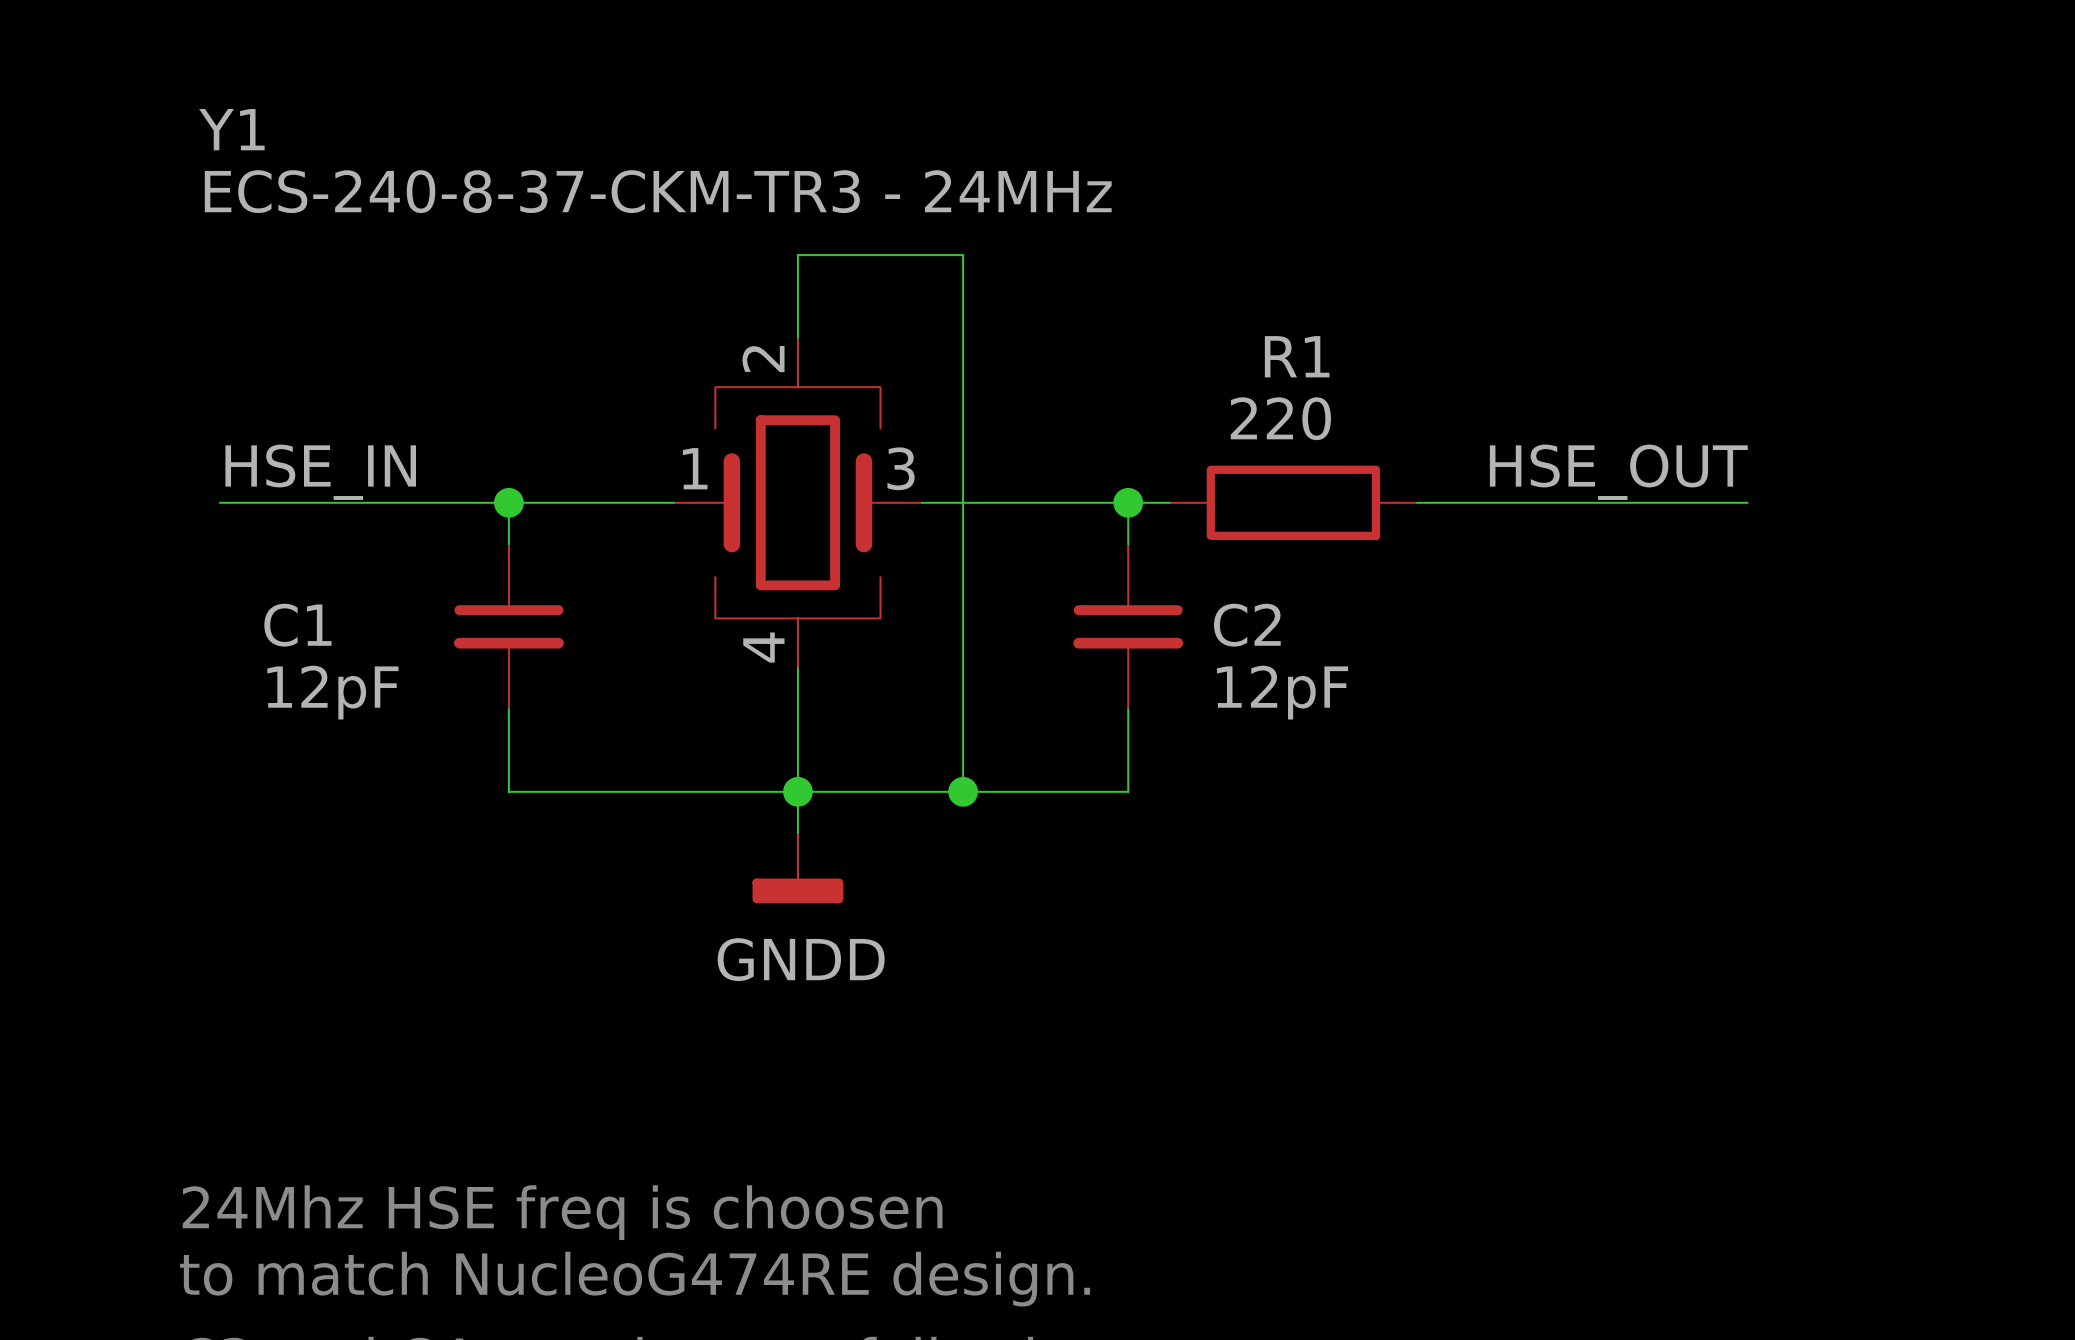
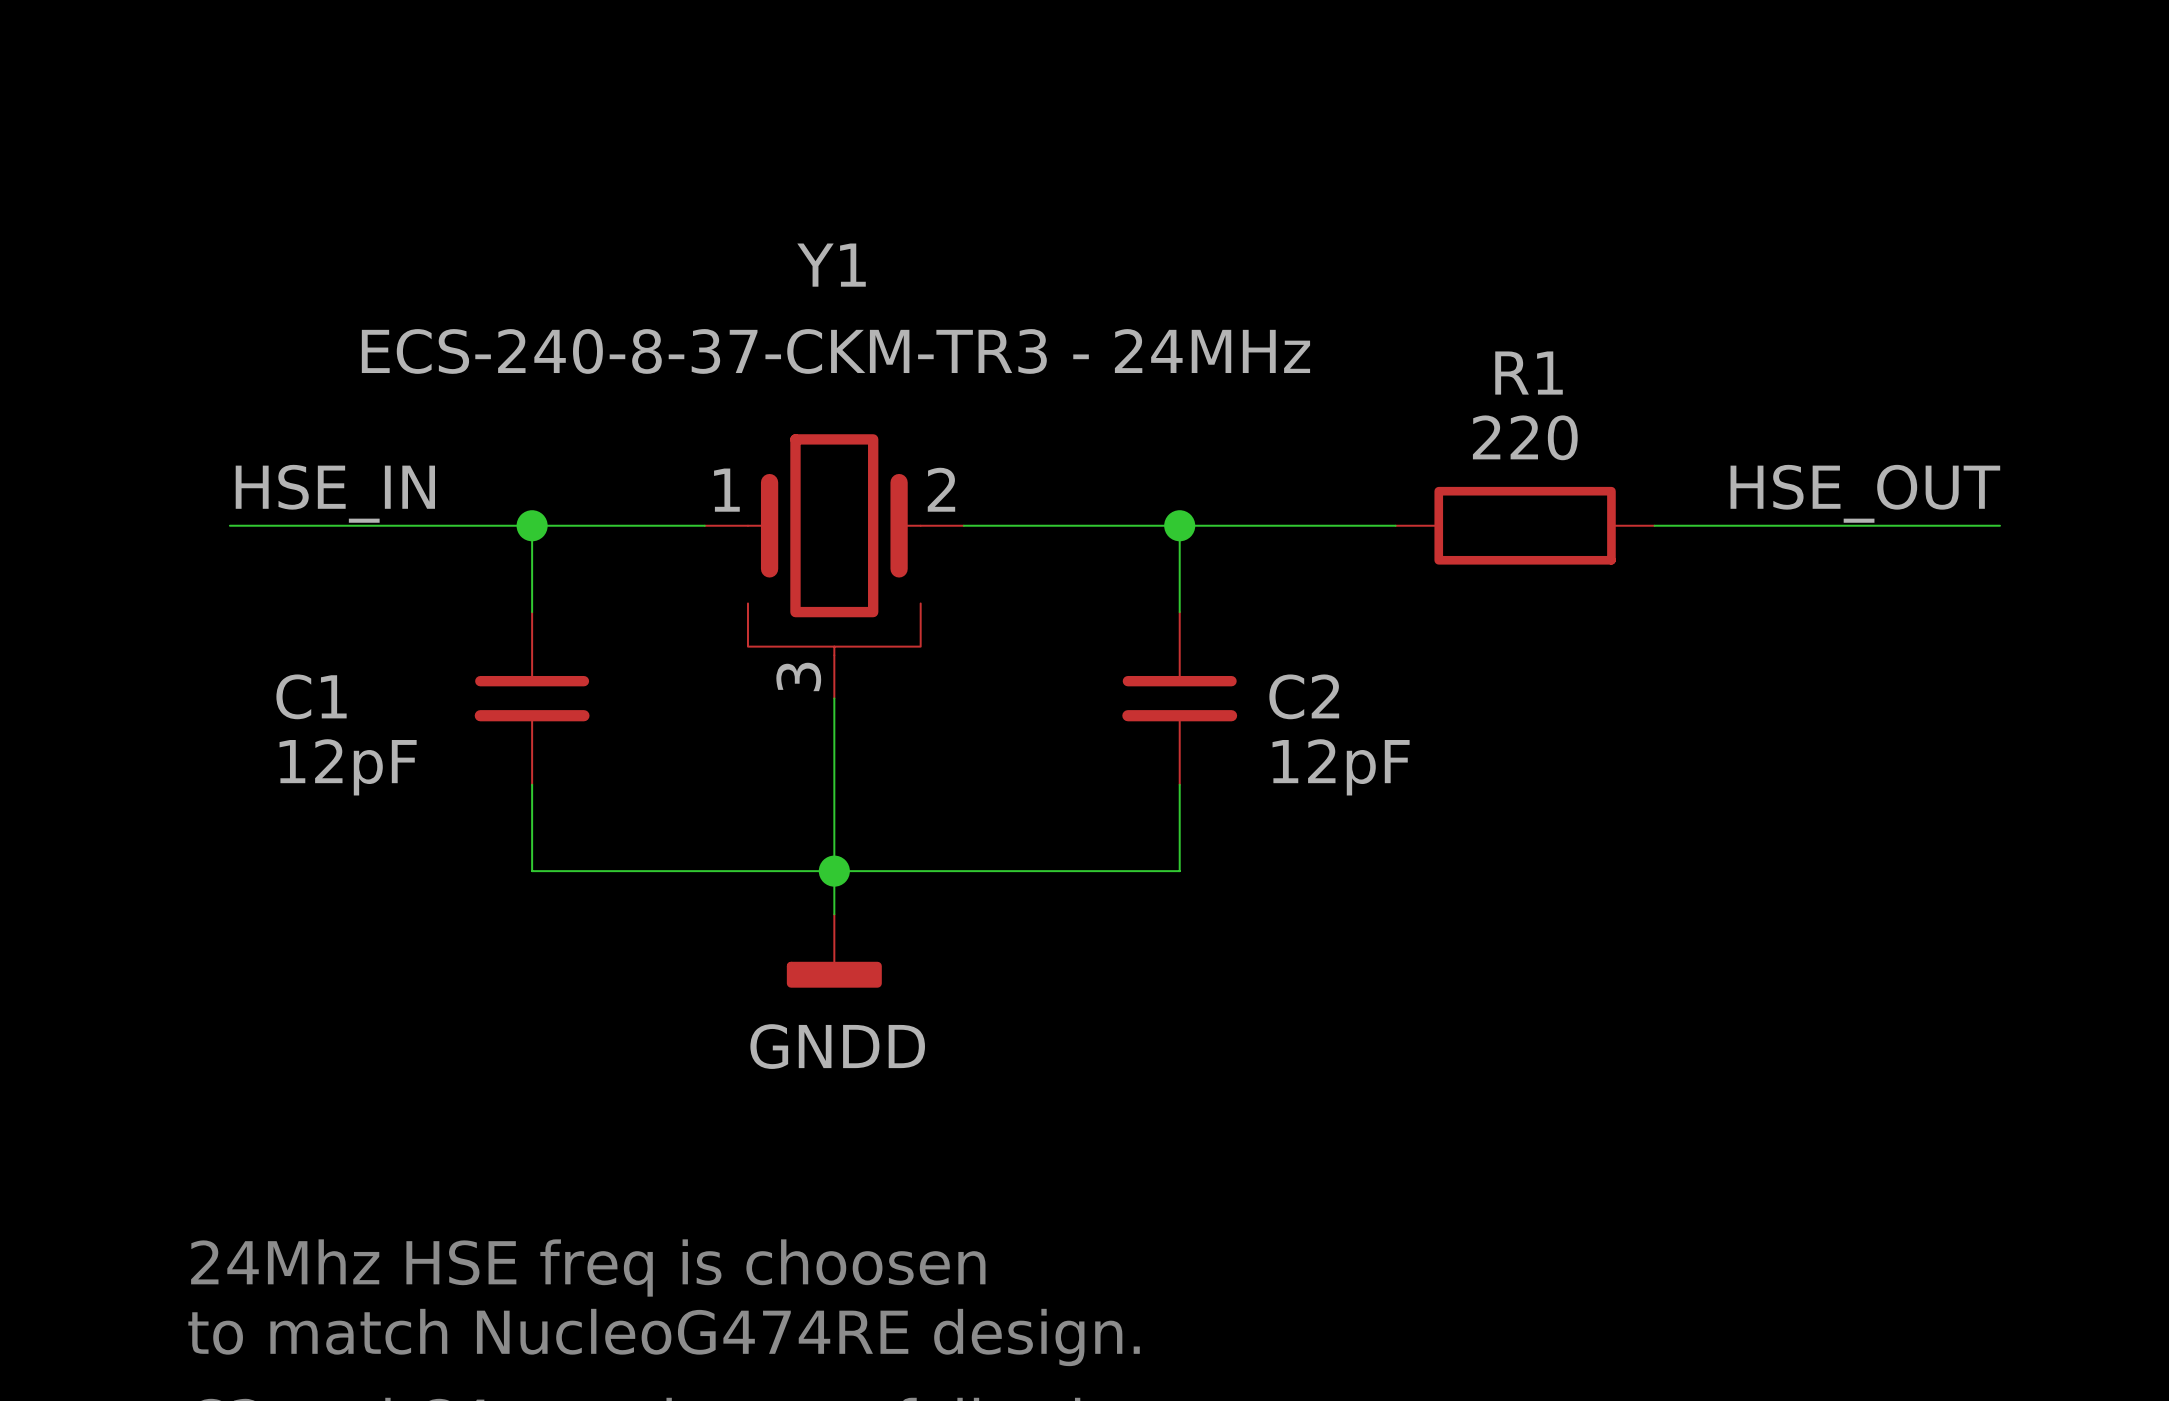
Y1 name position: Y1 (231, 129) -> Y1 (831, 265)
Y1 value position: ECS-240-8-37-CKM-TR3 - 24MHz (658, 191) -> ECS-240-8-37-CKM-TR3 - 24MHz (835, 351)
Y1 symbol: [674, 337, 922, 668] -> [704, 434, 964, 699]
wire: (797, 337) (797, 255) (963, 255) (963, 791) -> none
R1 value position: 220 (1280, 418) -> 220 (1525, 437)
label position: HSE_OUT (1618, 472) -> HSE_OUT (1865, 493)
R1 position: (1293, 502) -> (1525, 525)
wire: (1417, 502) (1582, 502) -> (1222, 525) (1395, 525)
wire: none -> (1827, 525) (2000, 525)
C1 position: (508, 626) -> (532, 698)
C2 position: (1128, 626) -> (1179, 698)
wire: (508, 791) (1128, 791) -> (532, 827) (532, 871) (1179, 871) (1179, 827)
junction position: (797, 791) -> (834, 871)
junction: (963, 791) -> none
power symbol position: GNDD (797, 868) -> GNDD (834, 951)

